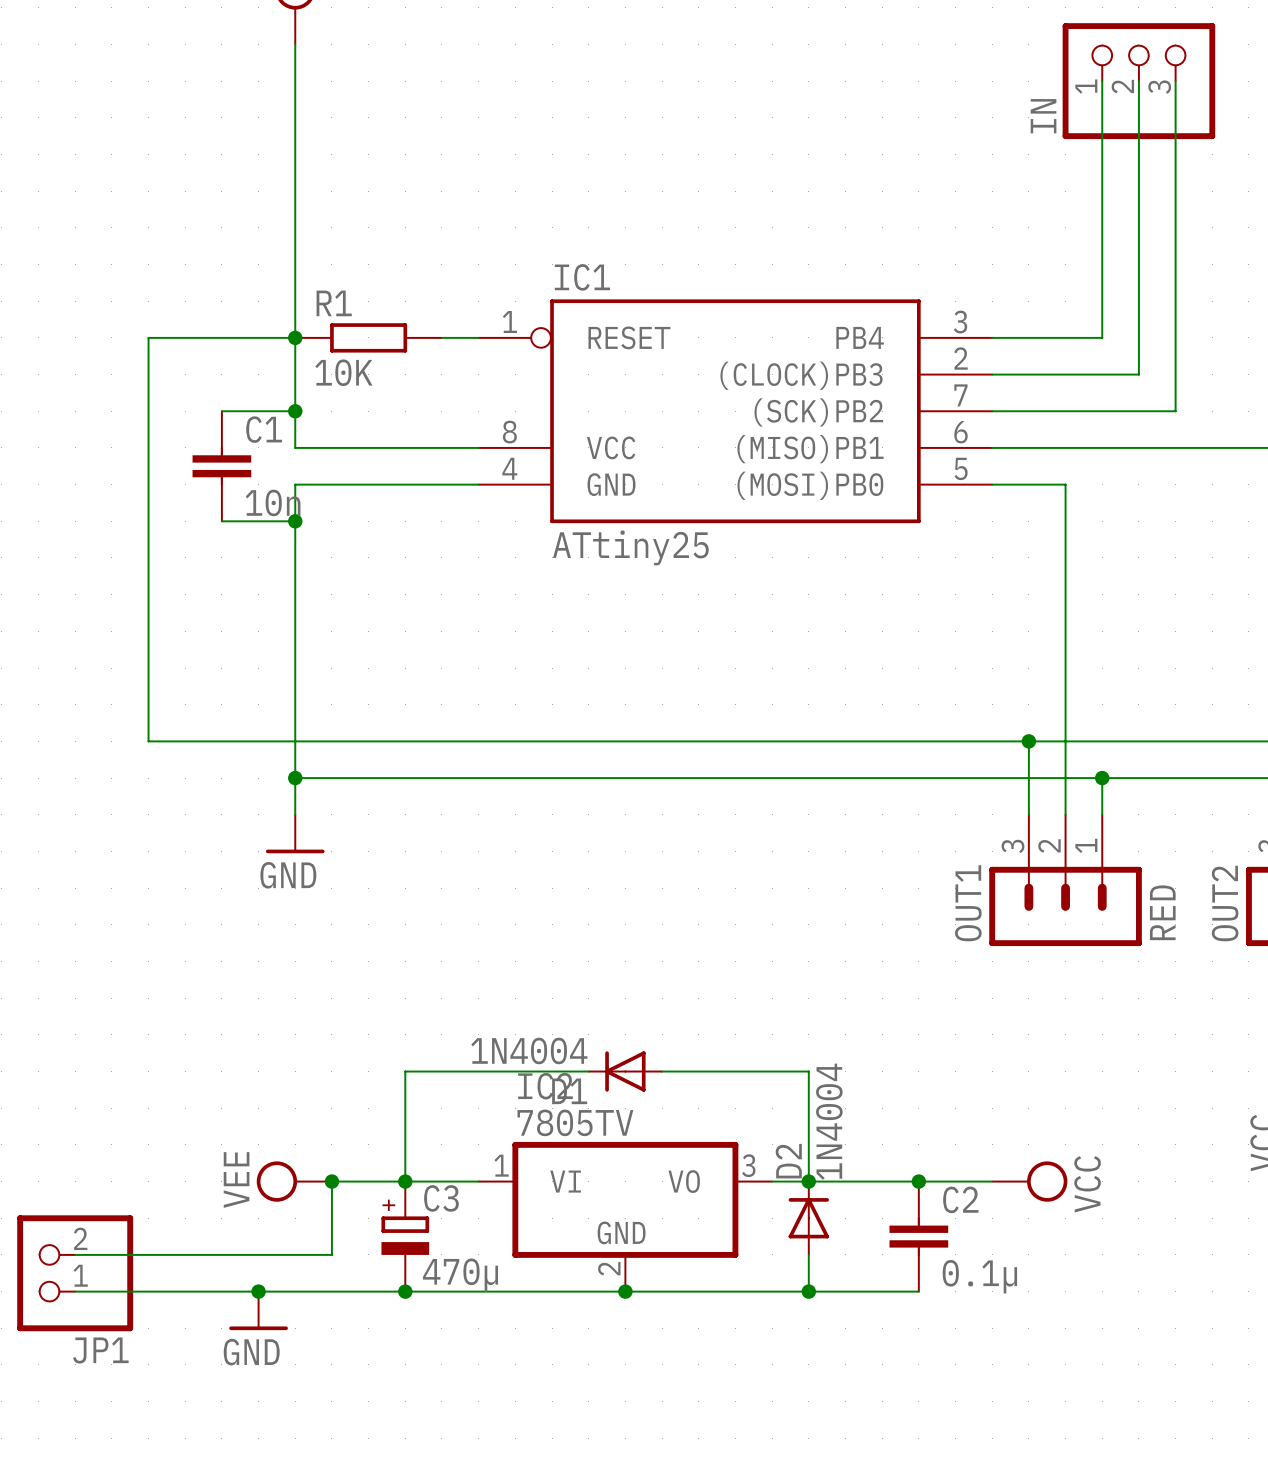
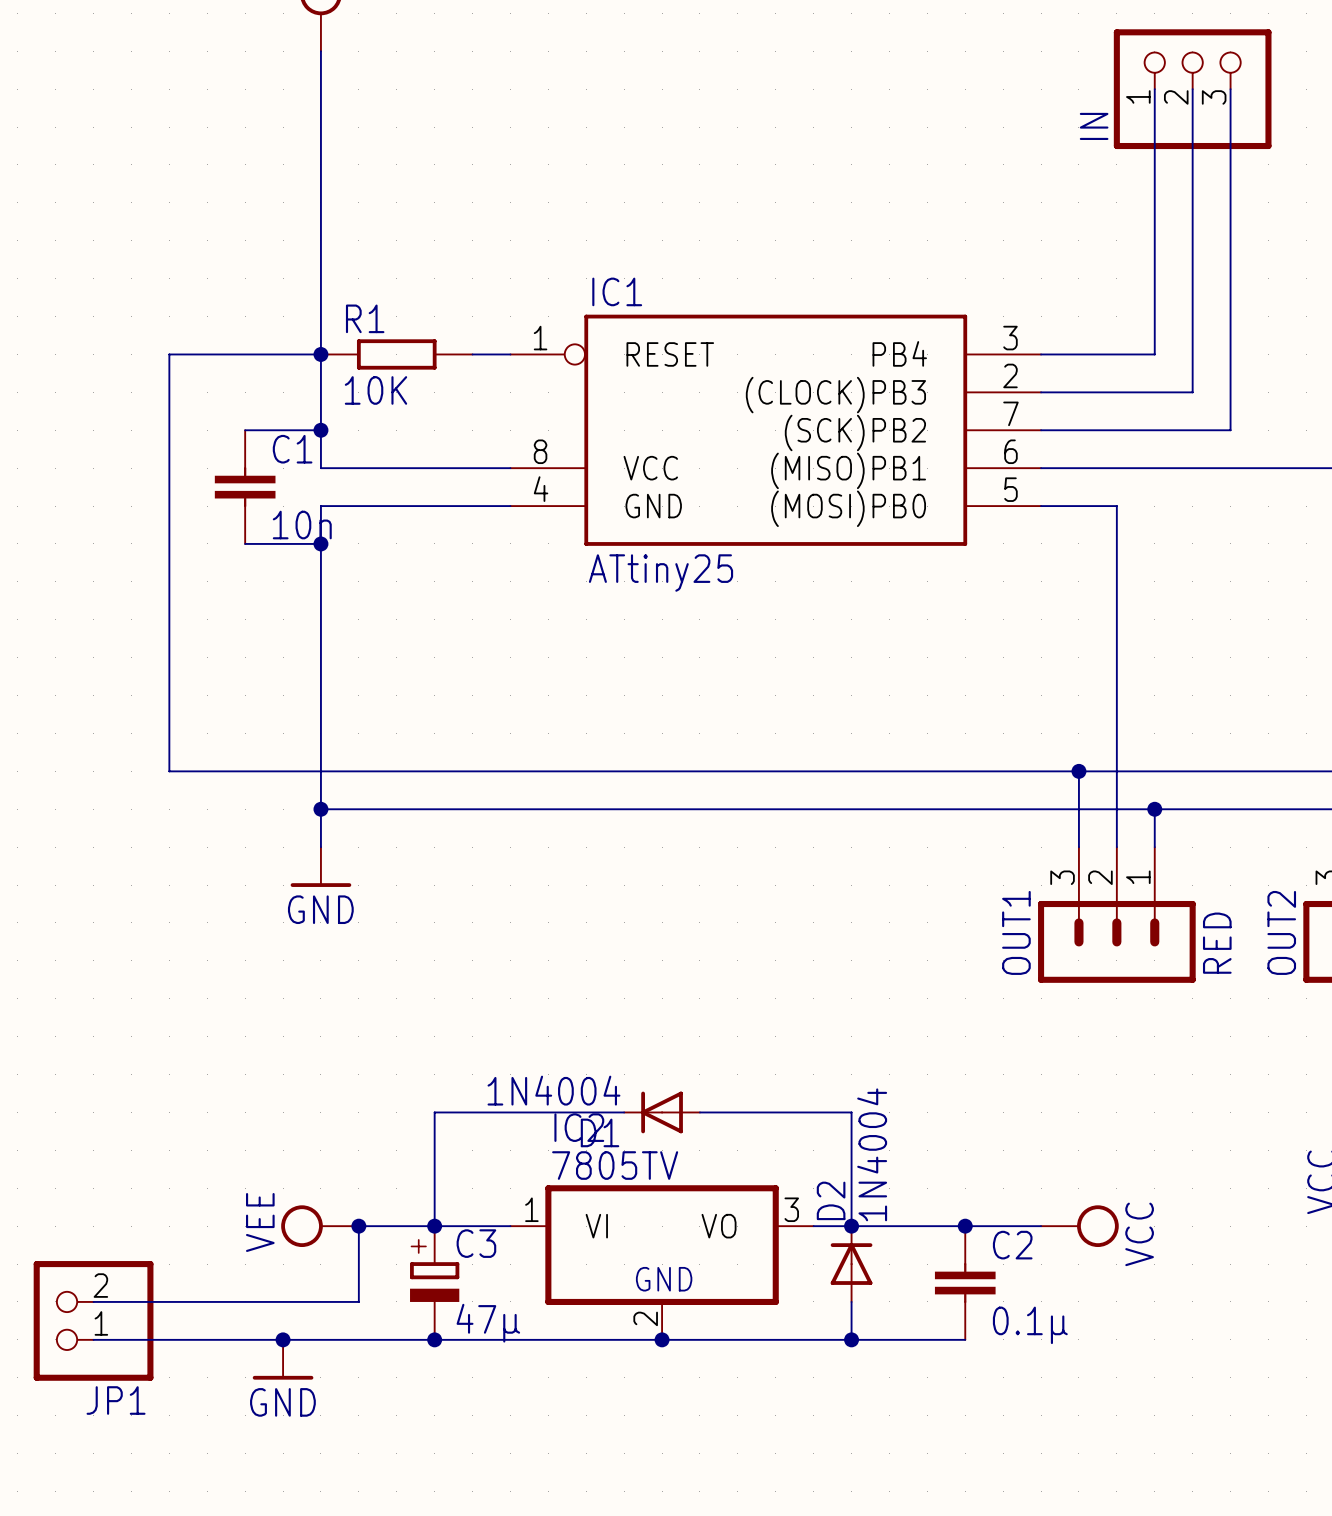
C3 value: 470µ (460, 1275) -> 47µ (488, 1323)

